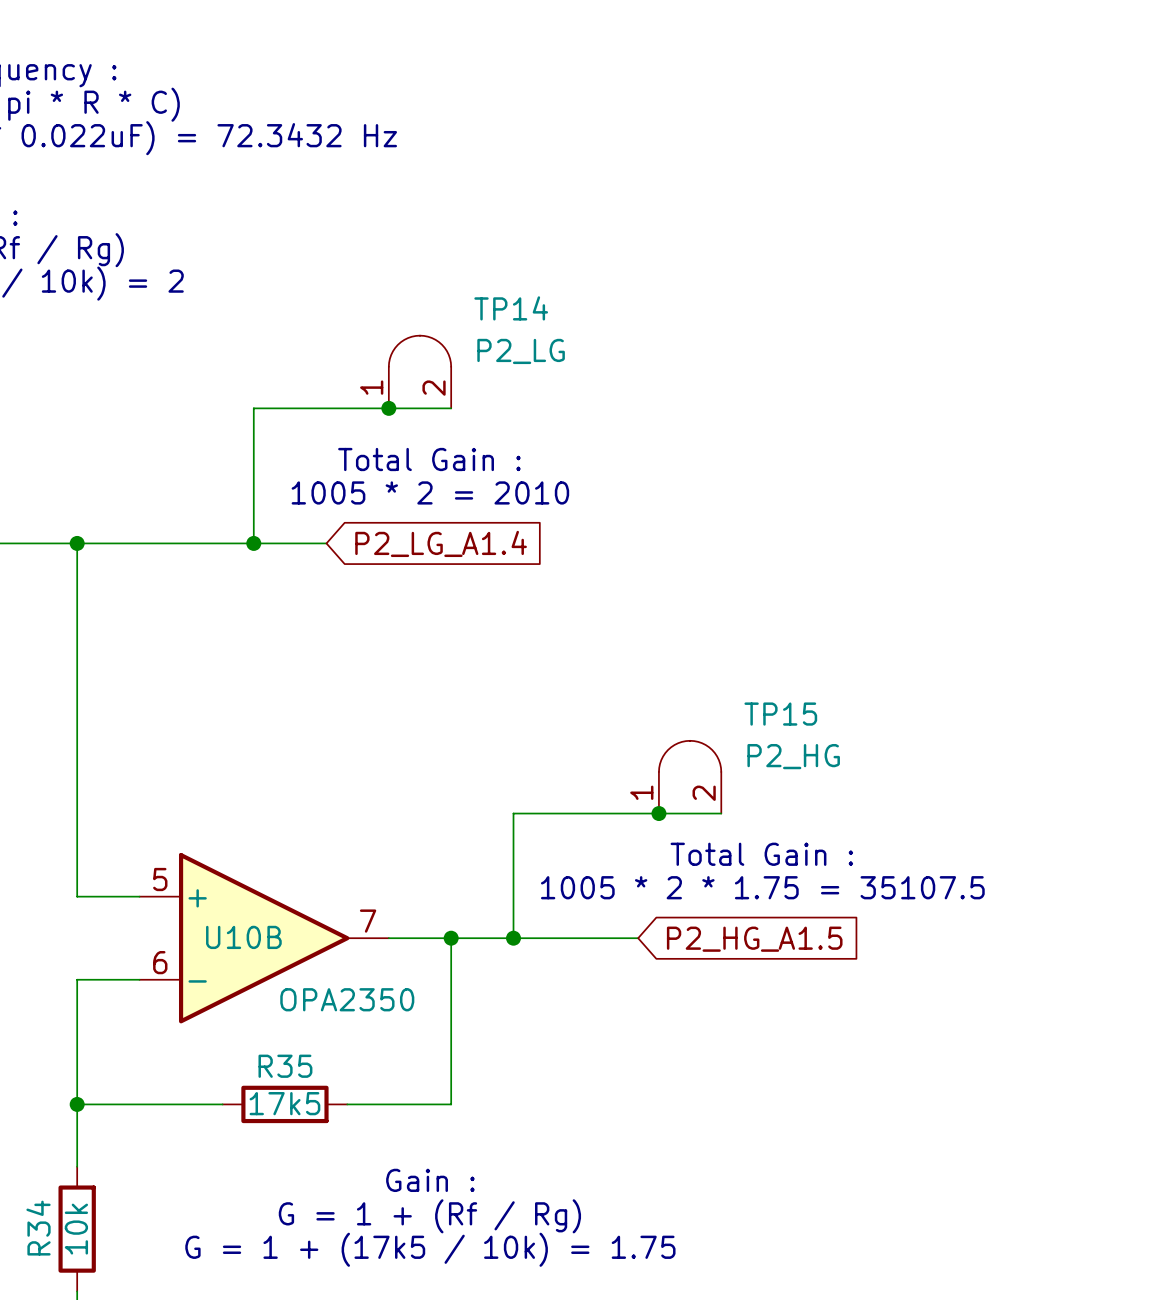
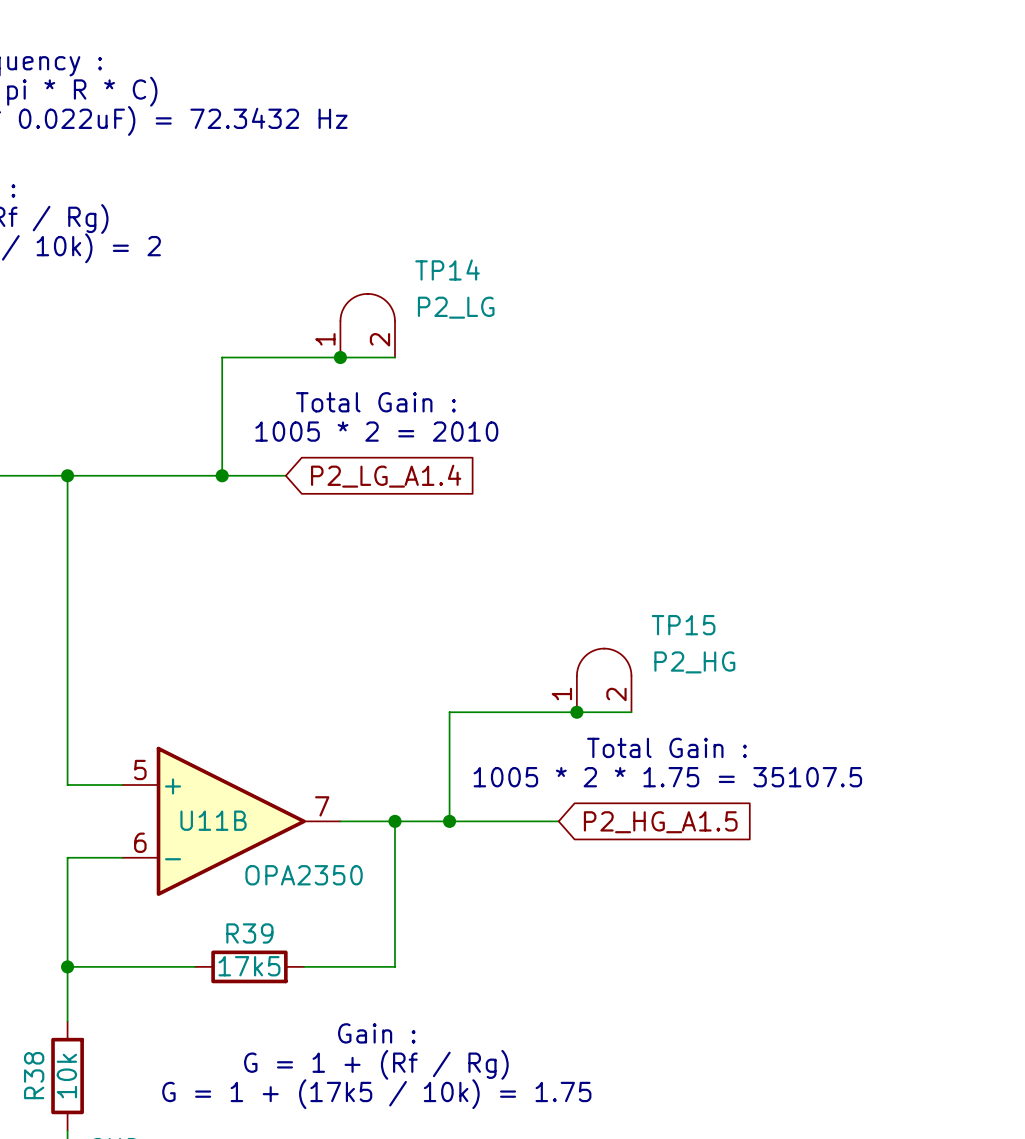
U10B name: U10B (243, 937) -> U11B (213, 820)
R35 name: R35 (285, 1066) -> R39 (249, 933)
R34 name: R34 (38, 1228) -> R38 (34, 1075)

